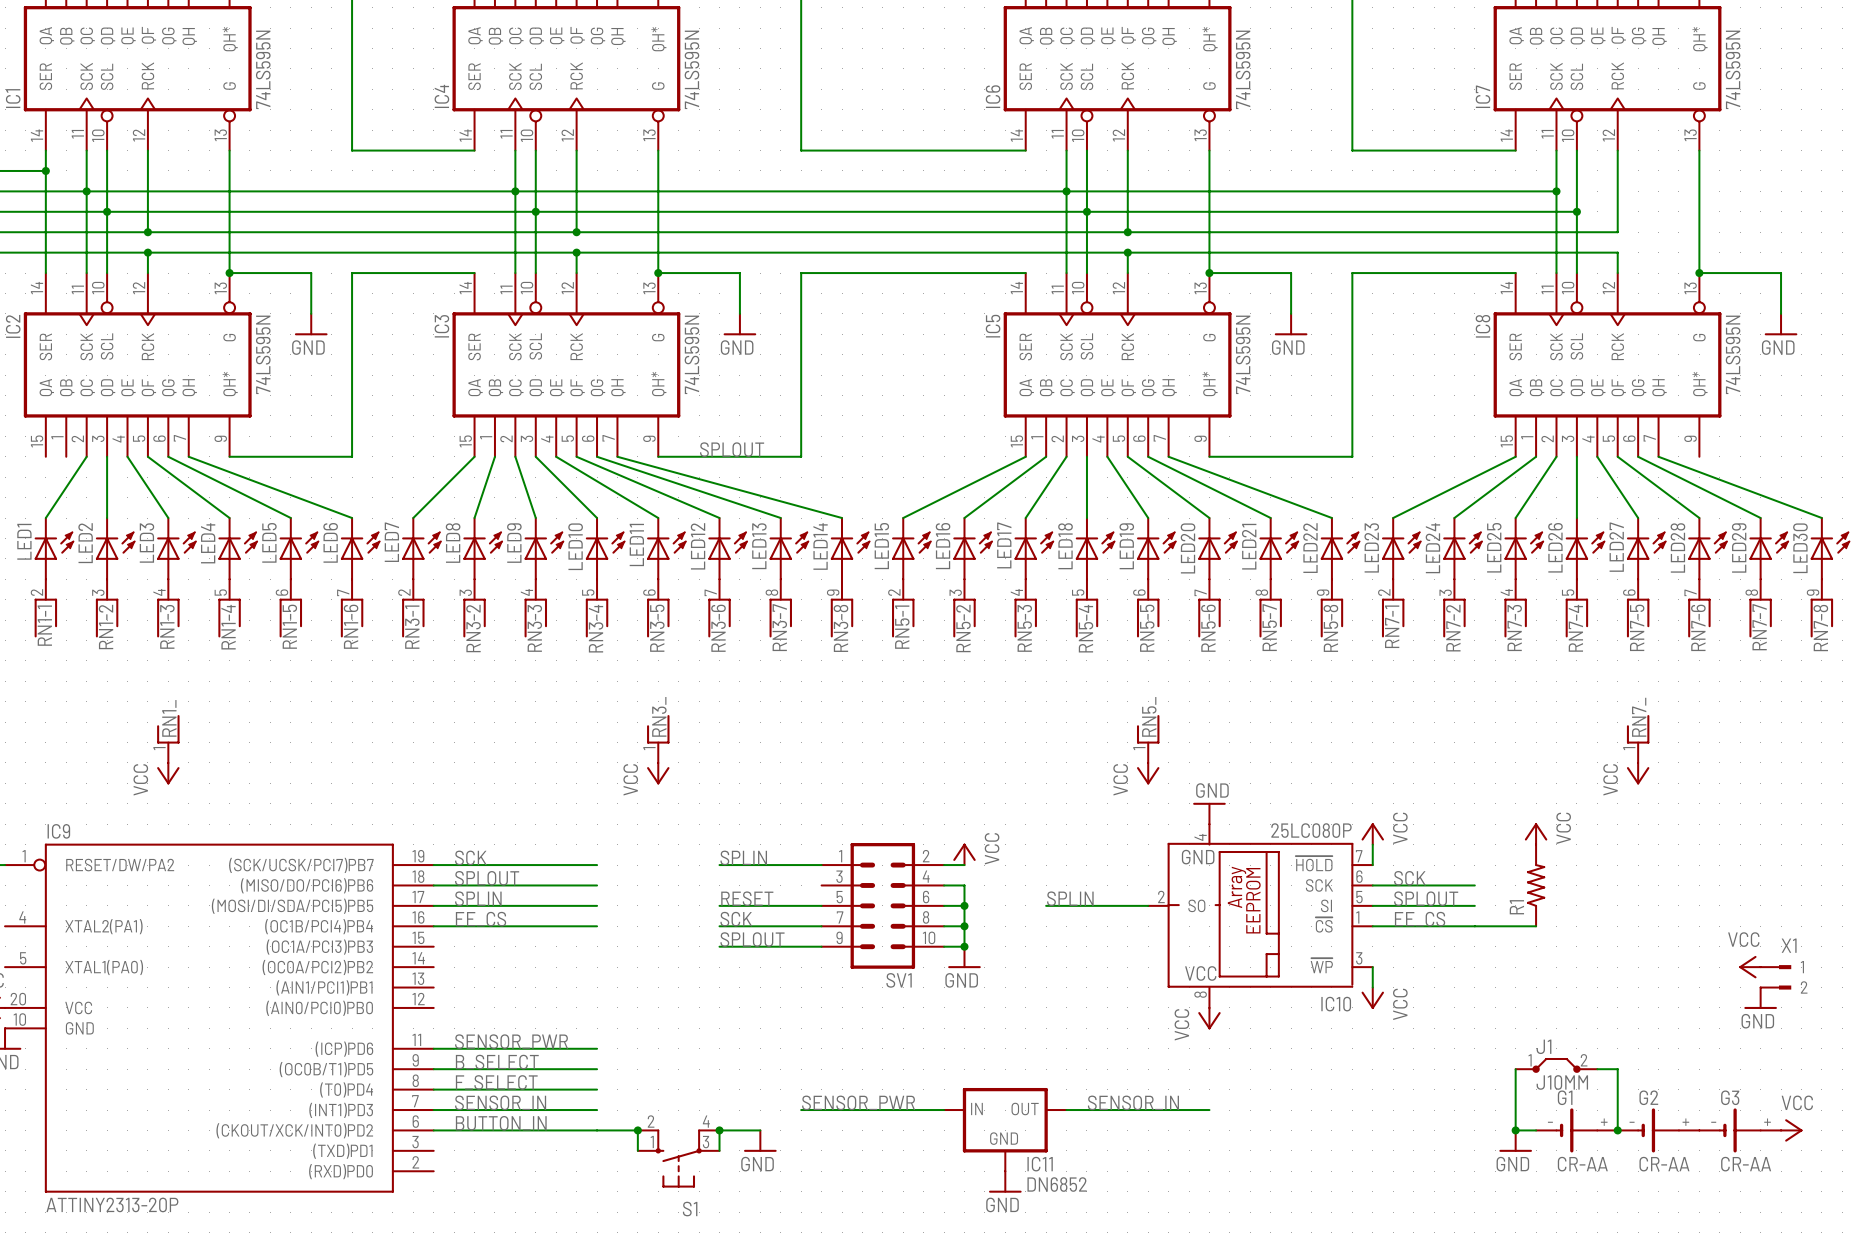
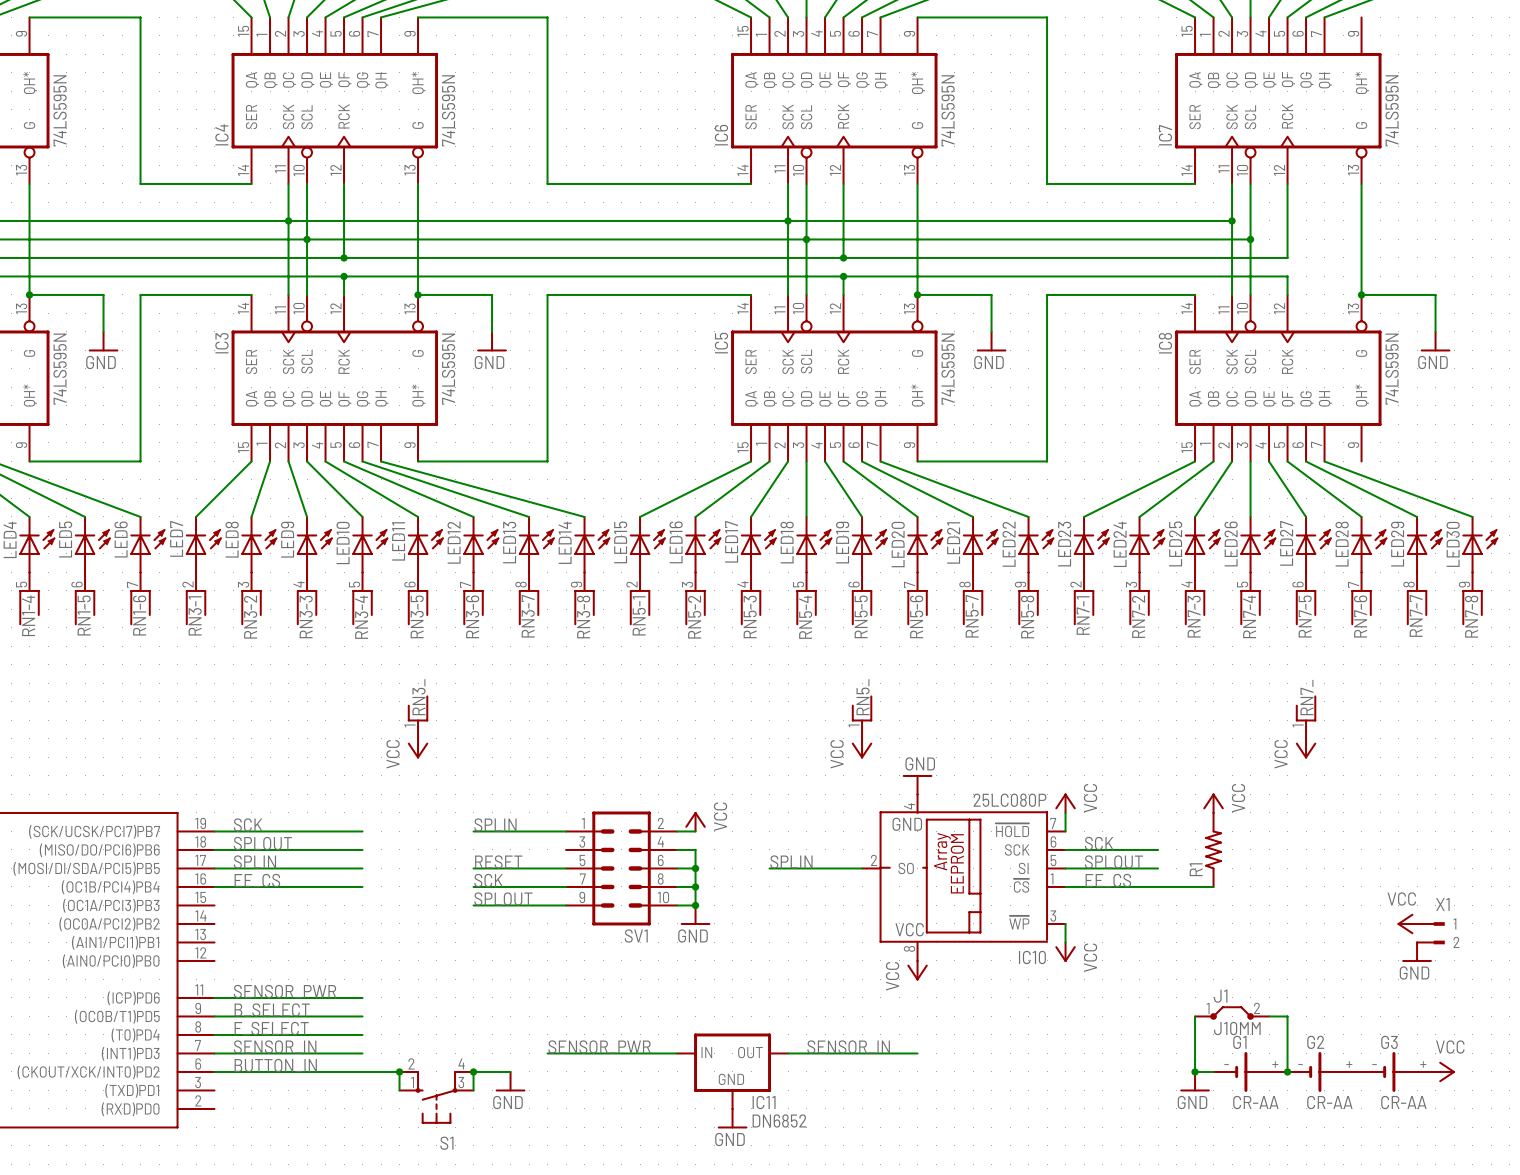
label: SPLOUT (732, 449) -> none

